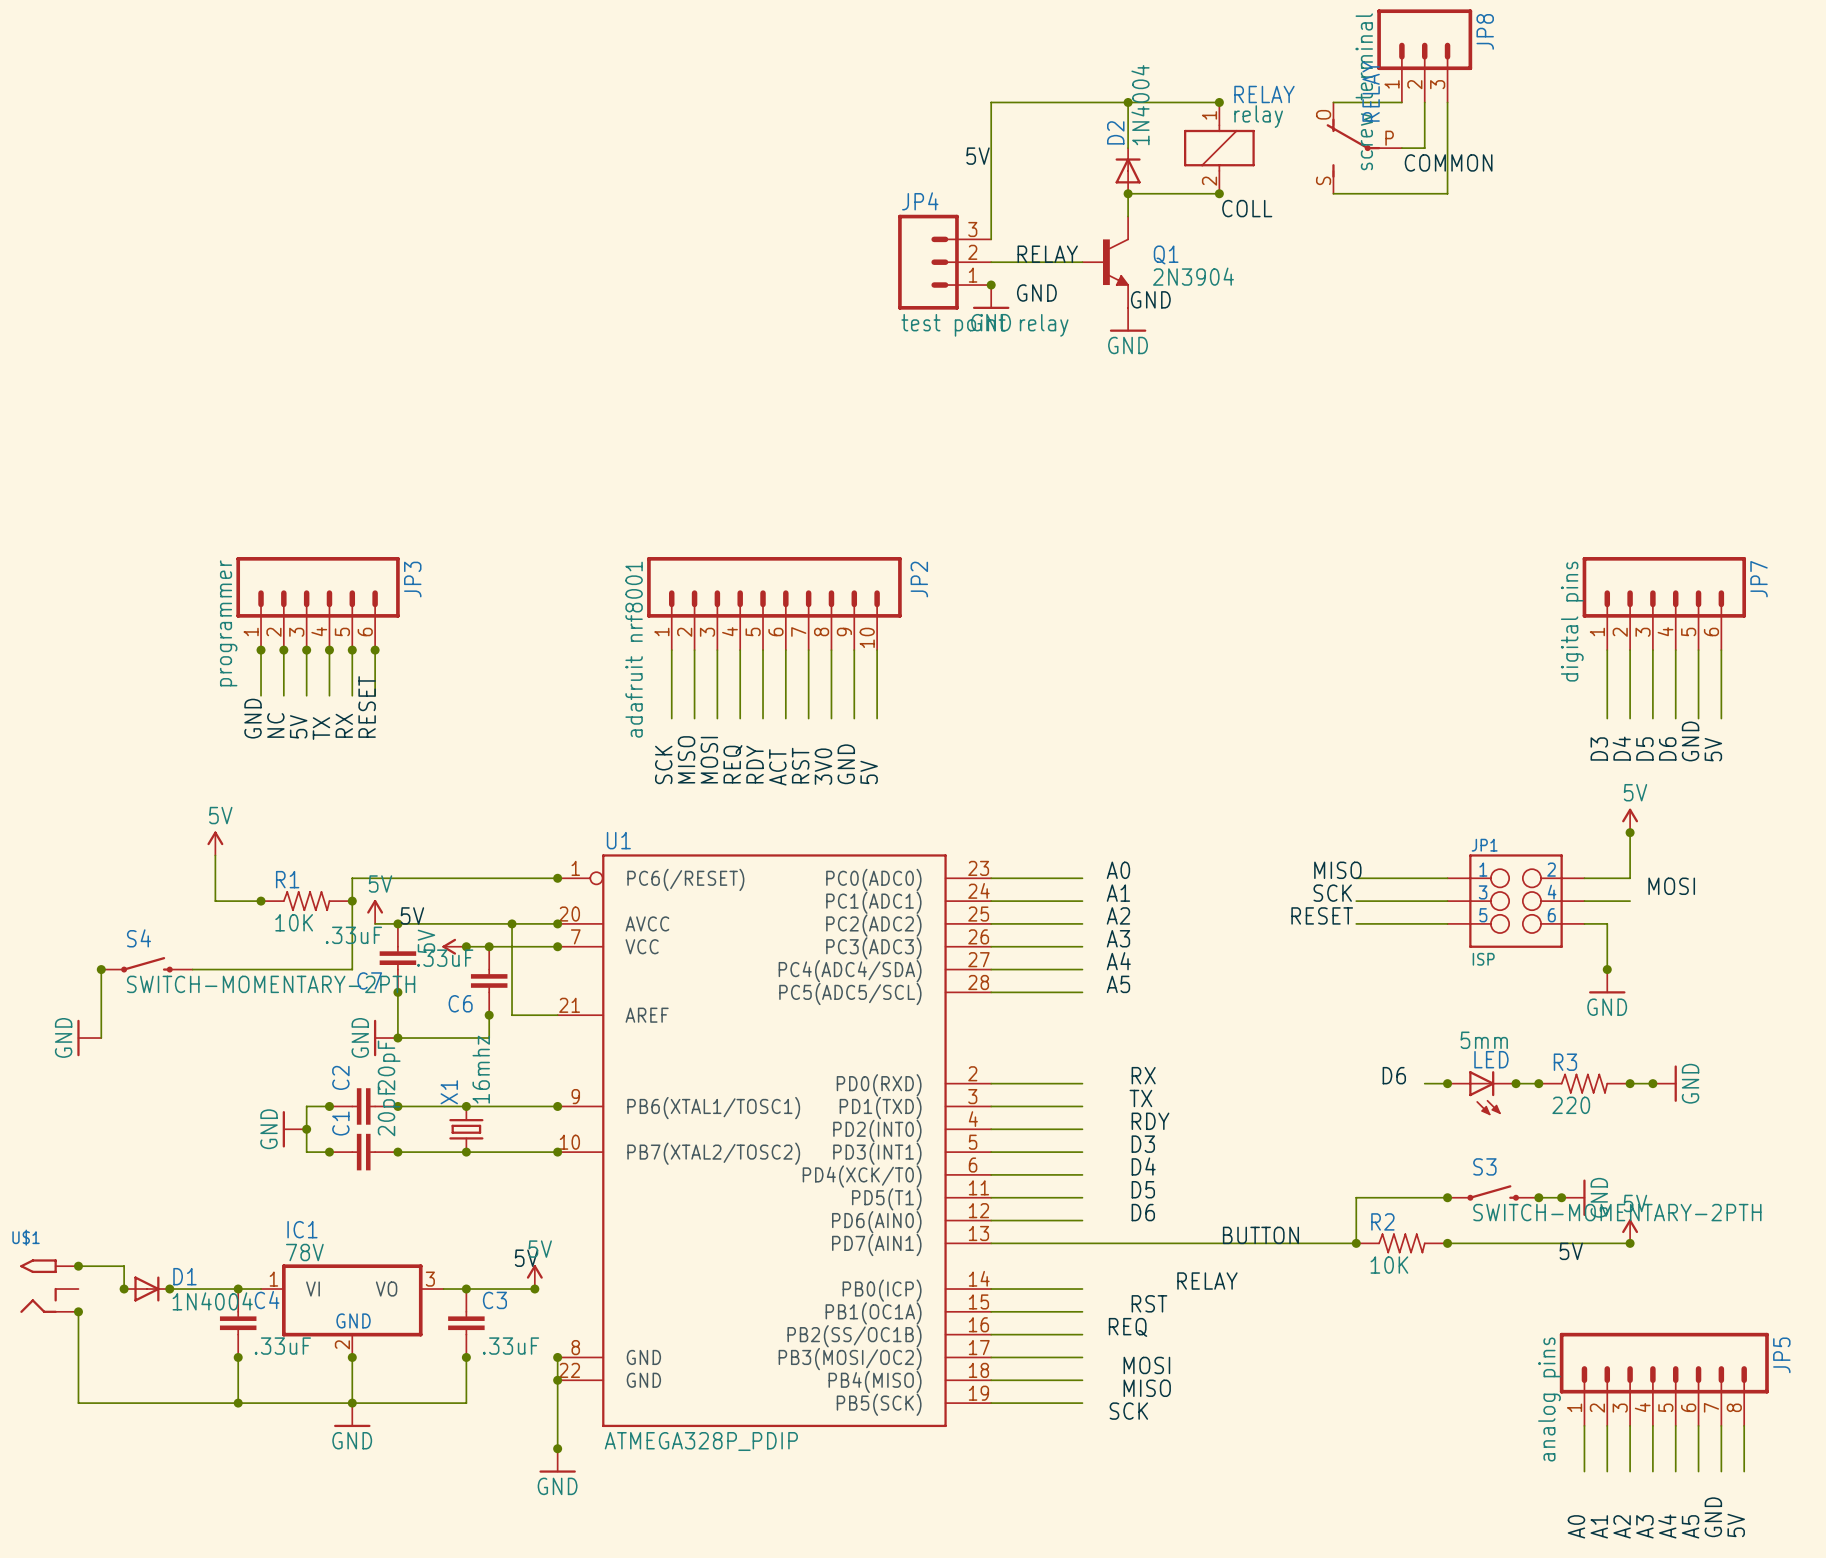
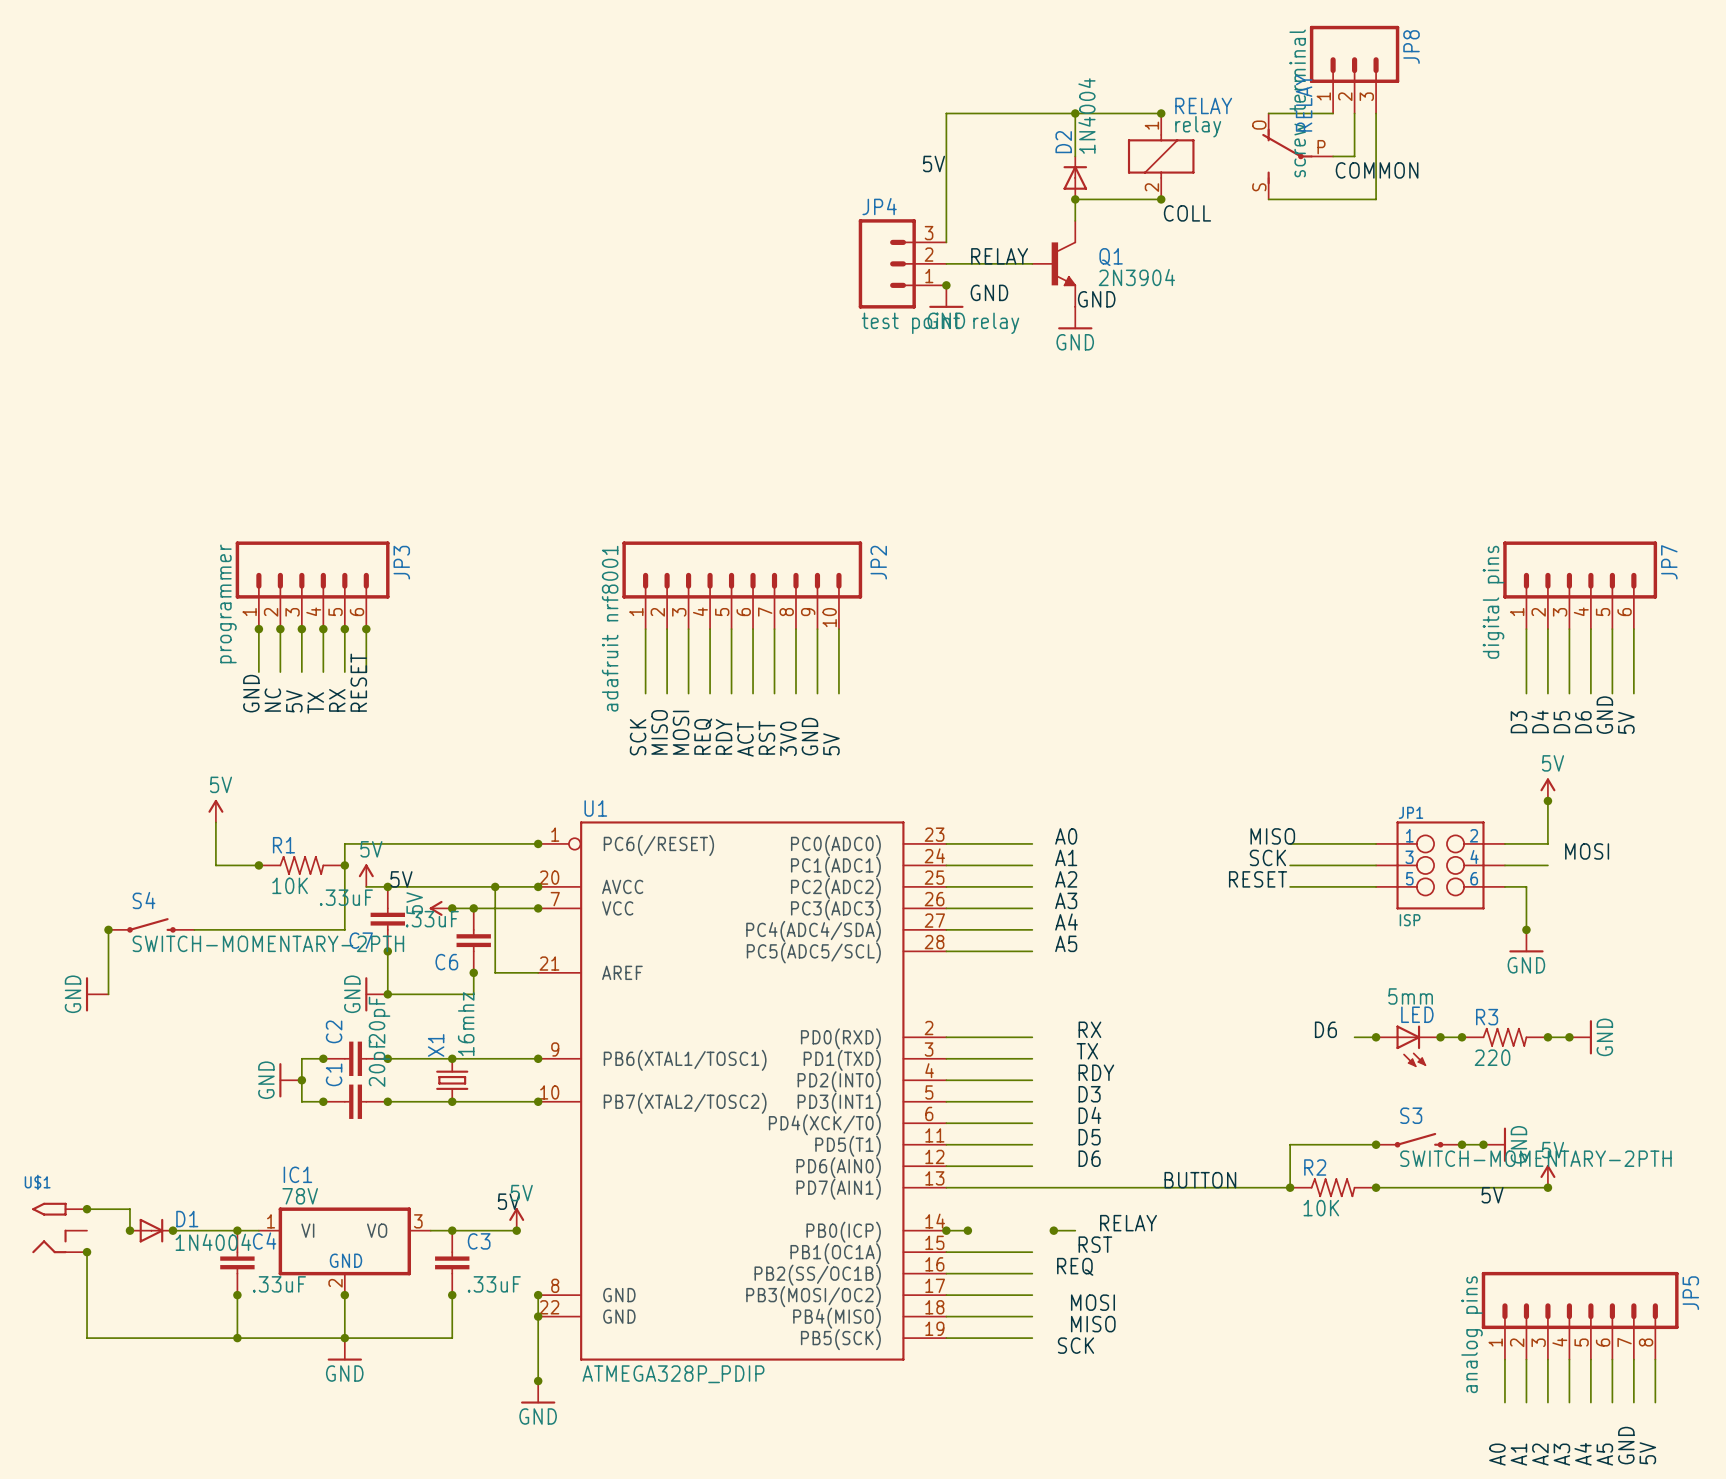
label position: RELAY (1207, 1281) -> RELAY (1128, 1223)
junction: none -> (946, 1230)
wire: (1014, 1289) (1082, 1289) -> none
junction: none -> (967, 1230)
wire: none -> (1053, 1230) (1075, 1230)
junction: none -> (1053, 1230)

